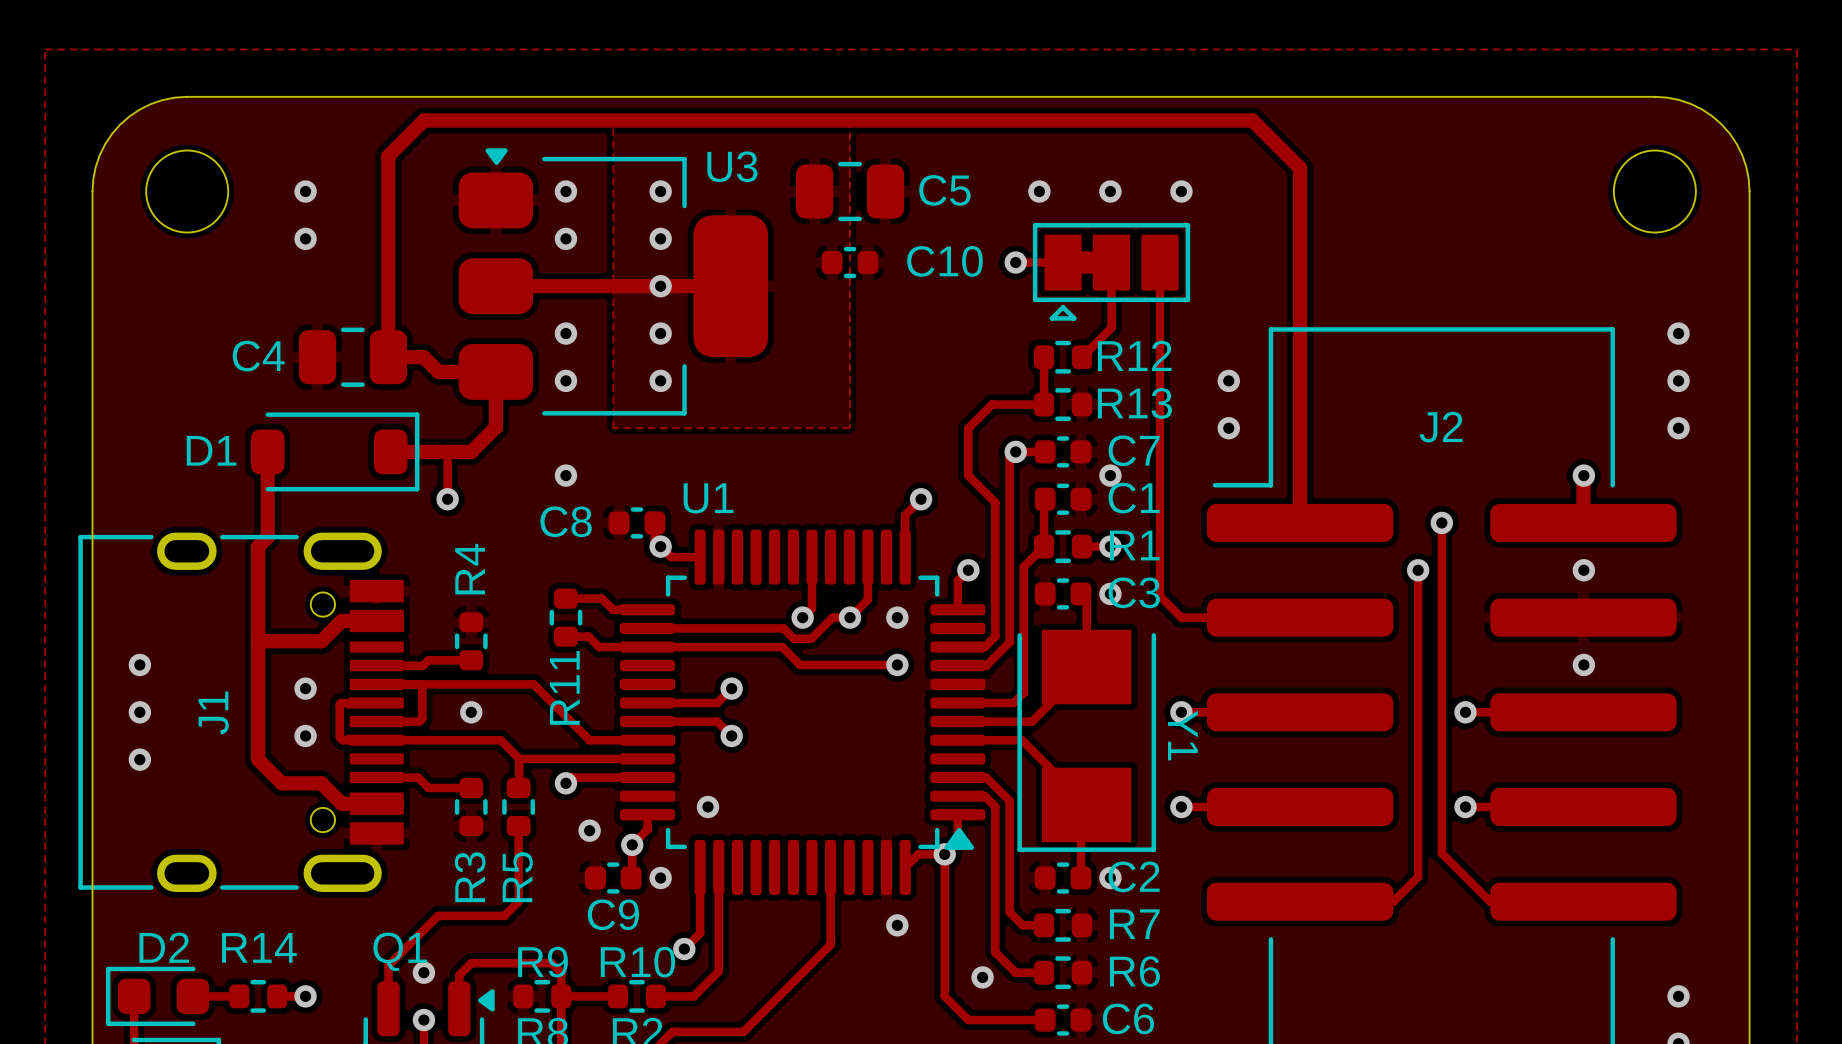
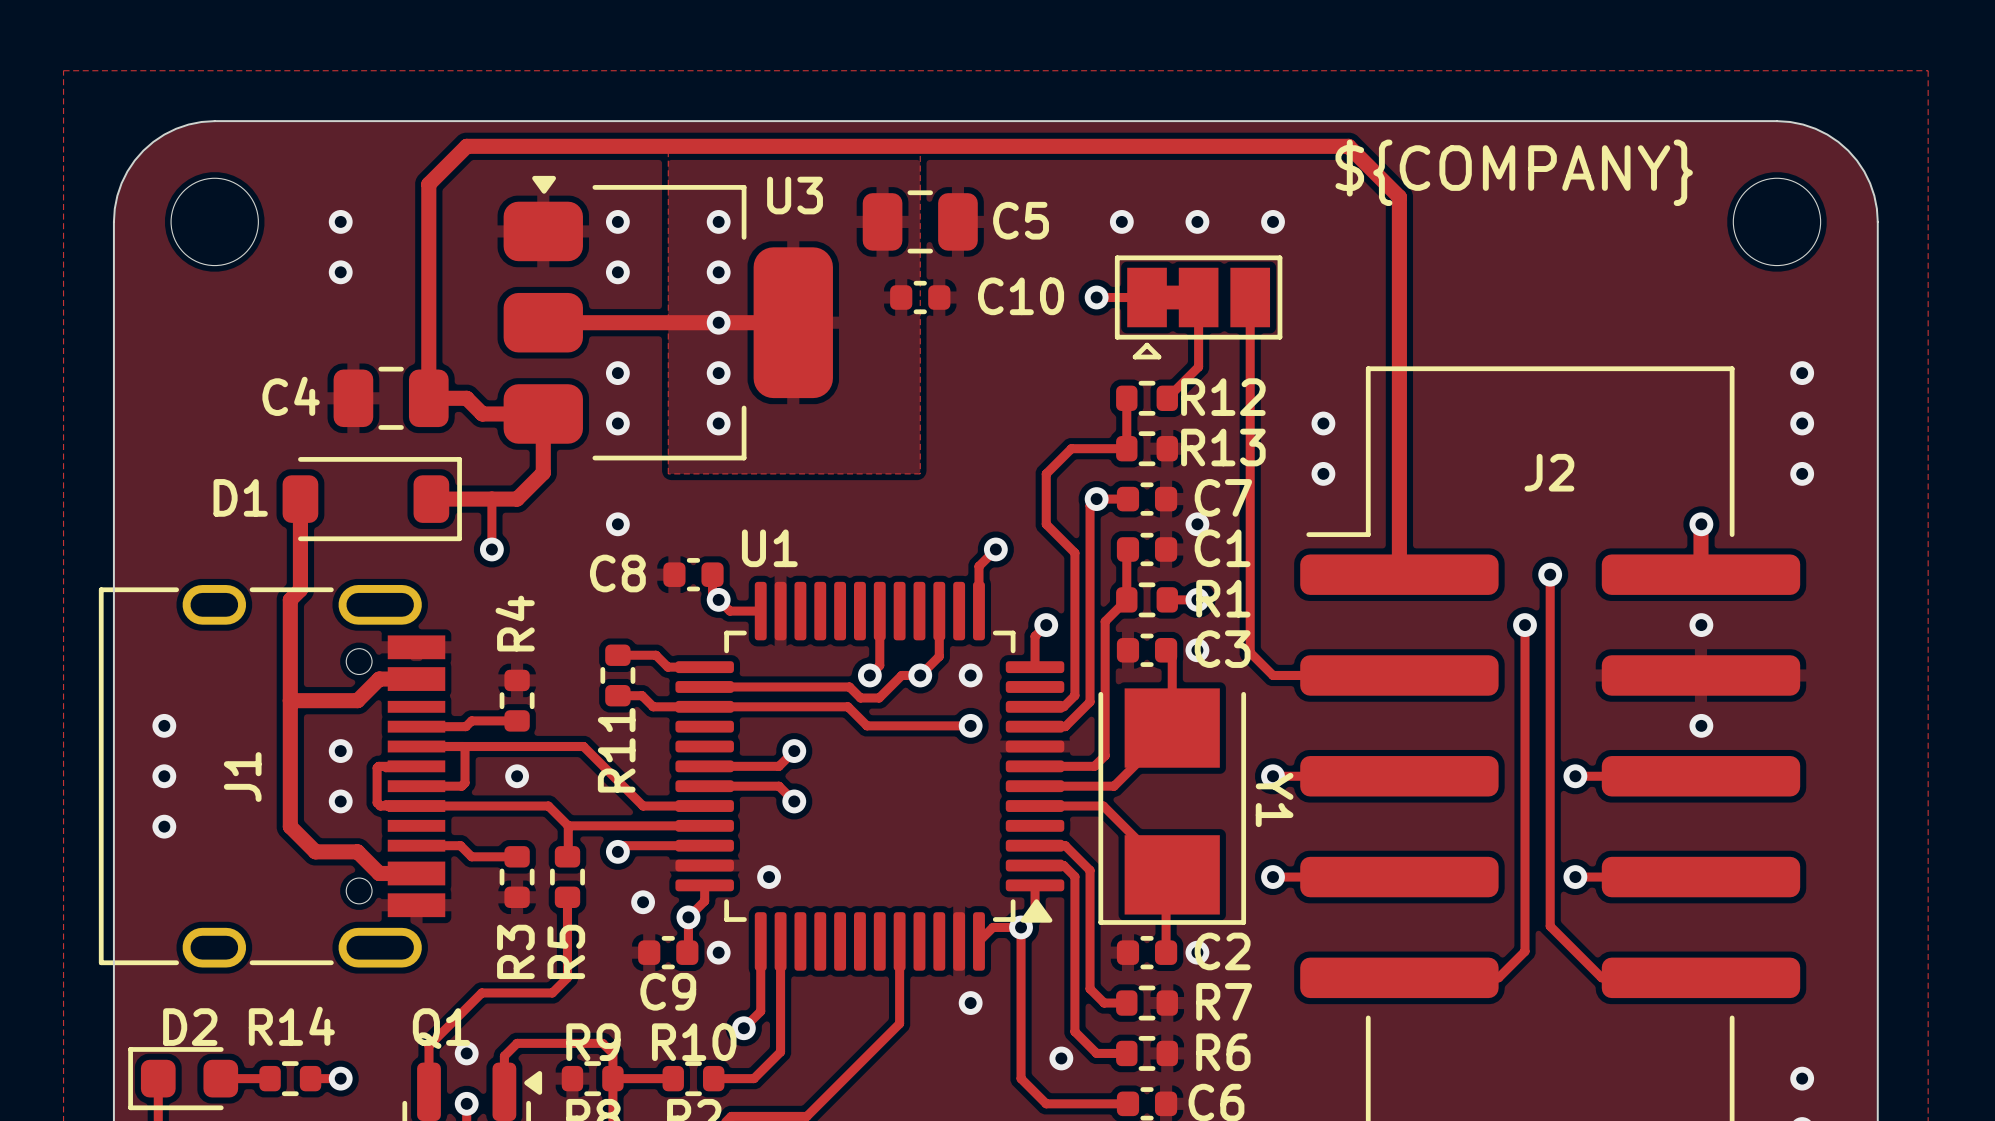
text: none -> ${COMPANY} (1514, 172)

